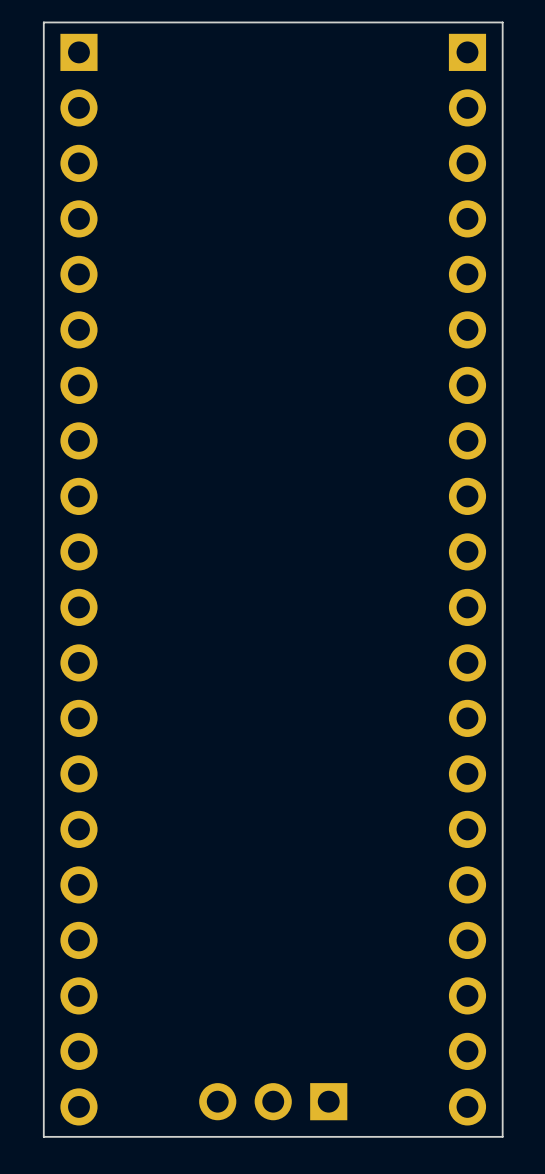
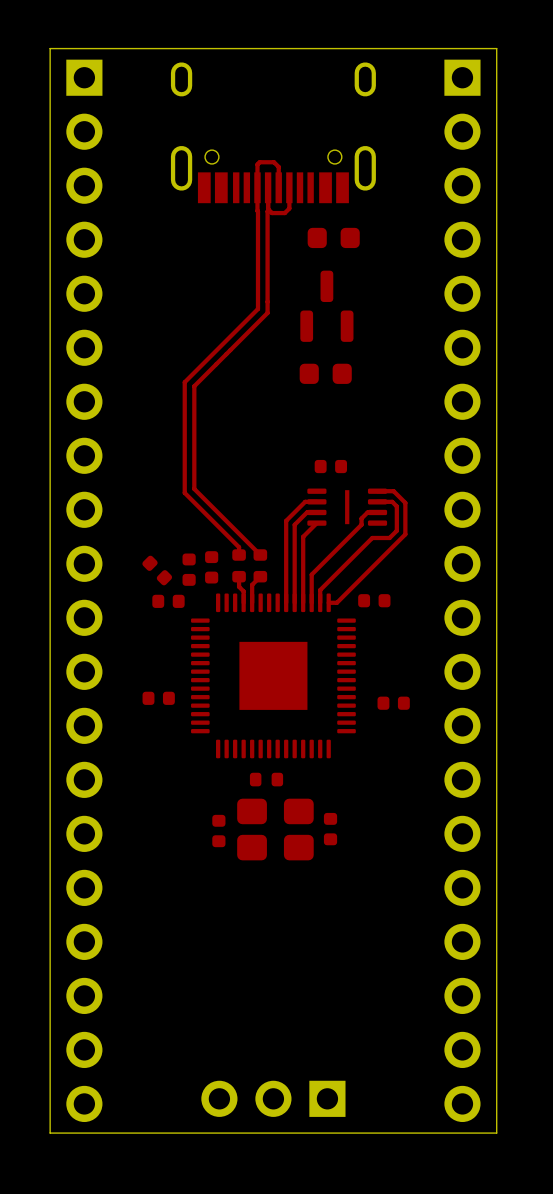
part: none -> (273, 132)
top track: none -> (268, 187) (267, 312) (194, 386) (194, 488) (260, 555)
top track: none -> (278, 187) (278, 166) (273, 162) (259, 162) (257, 164) (258, 309) (184, 382) (184, 492) (239, 547) (239, 555)
top track: none -> (289, 187) (289, 208) (284, 213) (272, 213) (268, 209)
part: none -> (333, 237)
part: none -> (326, 306)
part: none -> (325, 373)
part: none -> (330, 466)
top track: none -> (377, 491) (393, 491) (405, 502) (405, 534) (336, 602) (328, 602)
top track: none -> (316, 501) (305, 501) (286, 520) (286, 602)
top track: none -> (377, 501) (392, 501) (396, 506) (396, 530) (389, 537) (372, 537) (320, 590) (320, 602)
part: none -> (347, 507)
top track: none -> (316, 512) (307, 512) (294, 524) (294, 602)
top track: none -> (377, 512) (367, 512) (361, 518) (361, 524) (311, 574) (311, 602)
top track: none -> (316, 523) (303, 536) (303, 602)
part: none -> (239, 565)
part: none -> (260, 565)
part: none -> (211, 567)
part: none -> (189, 569)
part: none -> (157, 570)
top track: none -> (239, 576) (239, 586) (243, 591) (243, 602)
top track: none -> (260, 576) (252, 584) (252, 602)
part: none -> (374, 600)
part: none -> (168, 601)
part: none -> (273, 675)
part: none -> (158, 698)
part: none -> (393, 703)
part: none -> (266, 779)
part: none -> (275, 829)
part: none -> (330, 829)
part: none -> (218, 831)

